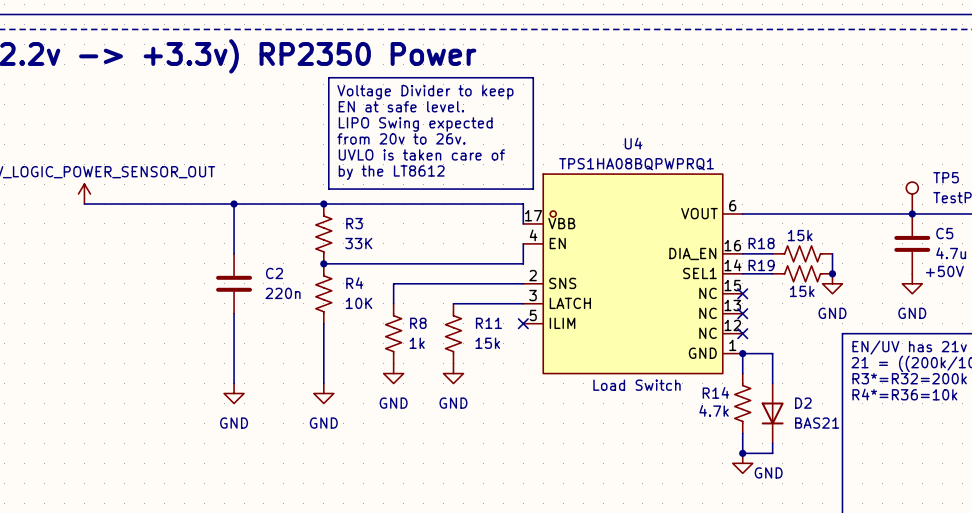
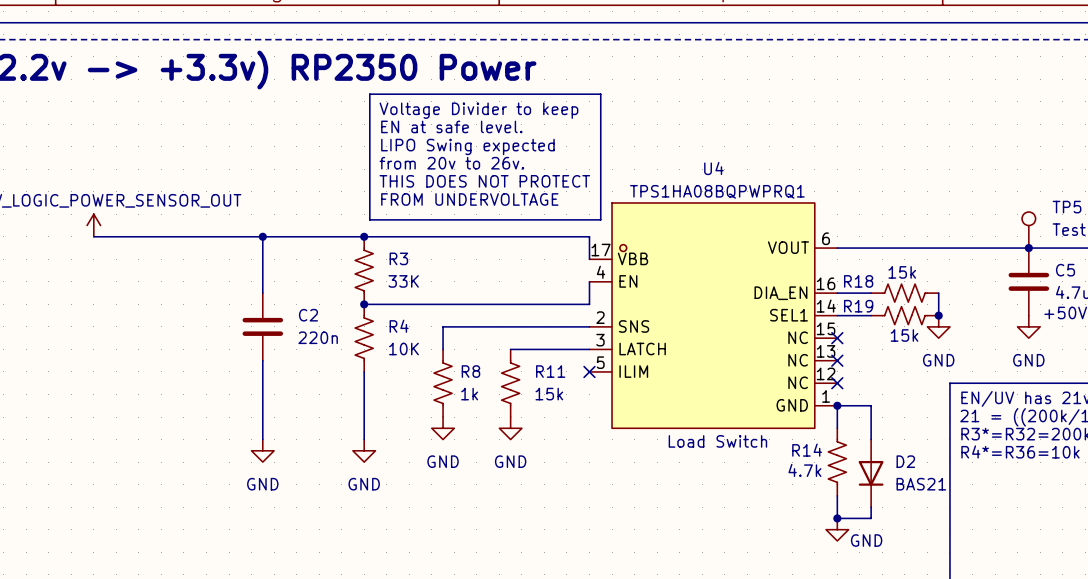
text: UVLO is taken care of (421, 154) -> THIS DOES NOT PROTECT (484, 181)
text: by the LT8612 (391, 172) -> FROM UNDERVOLTAGE (469, 199)

